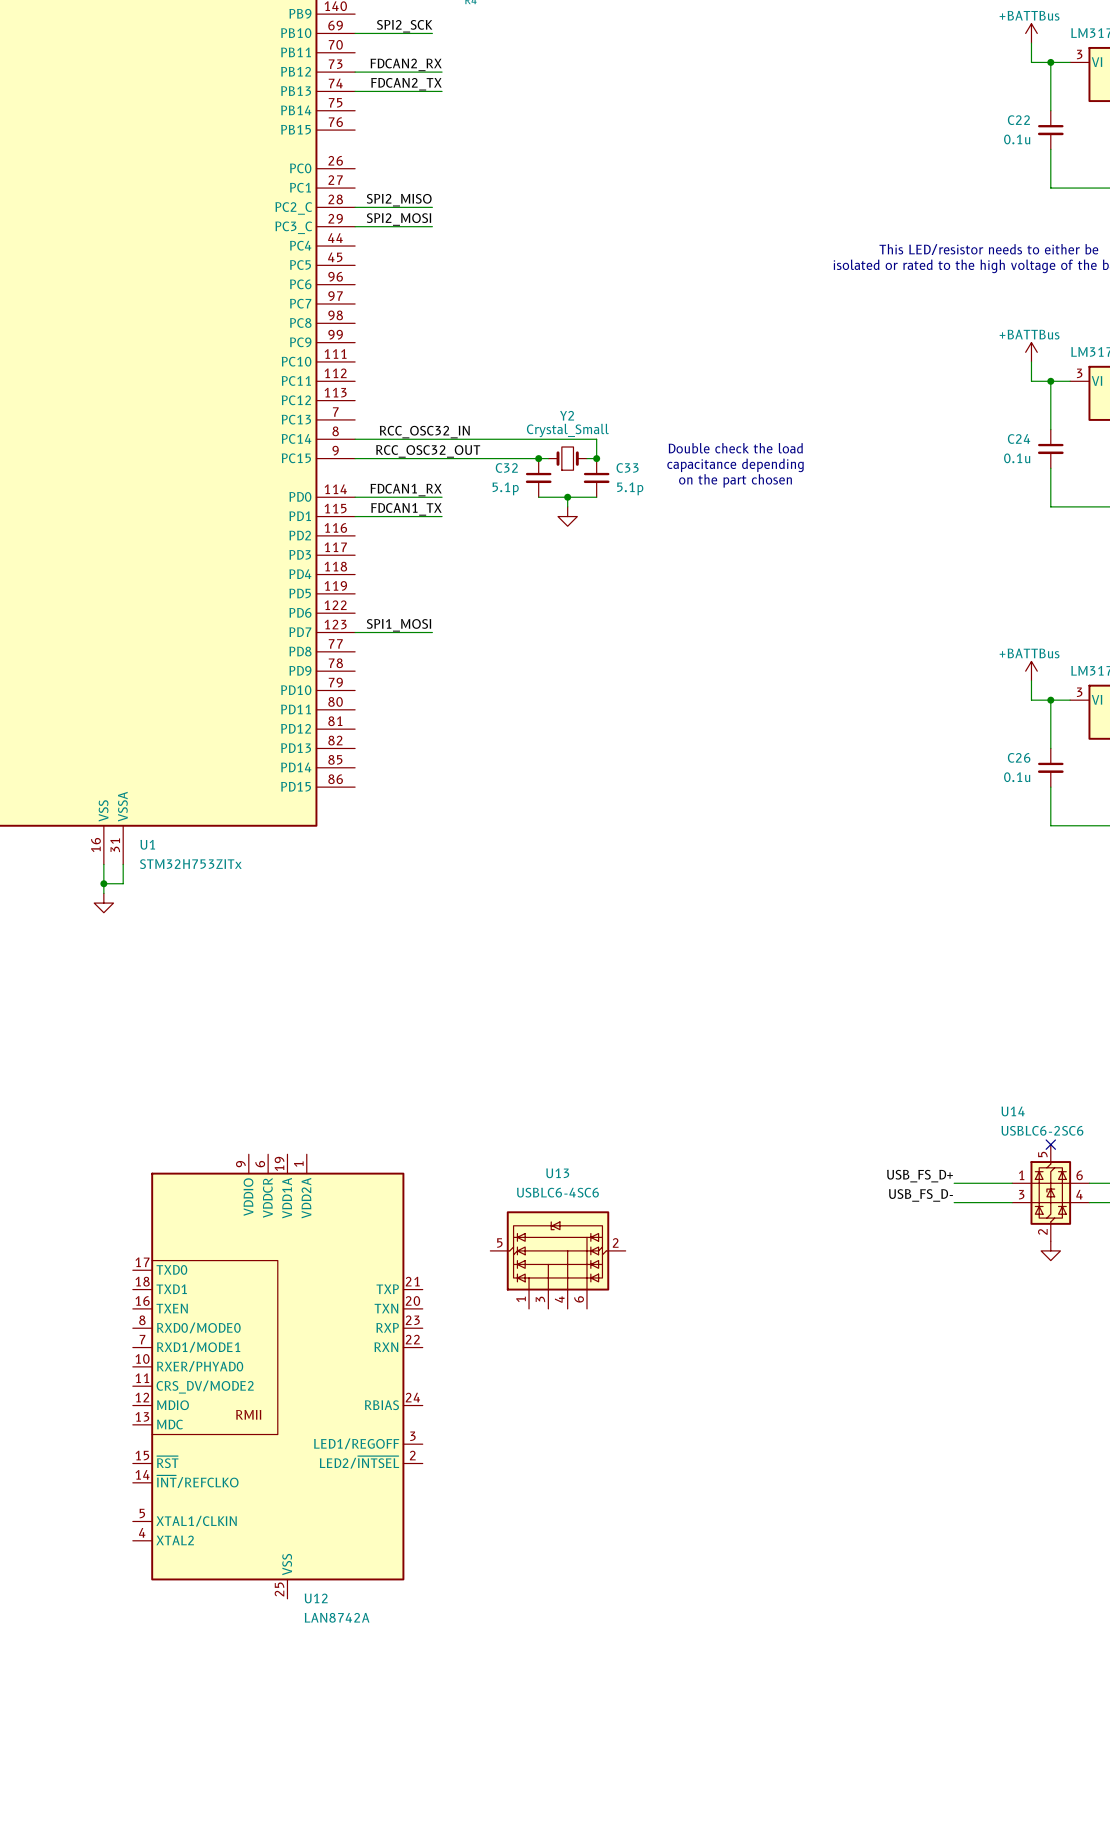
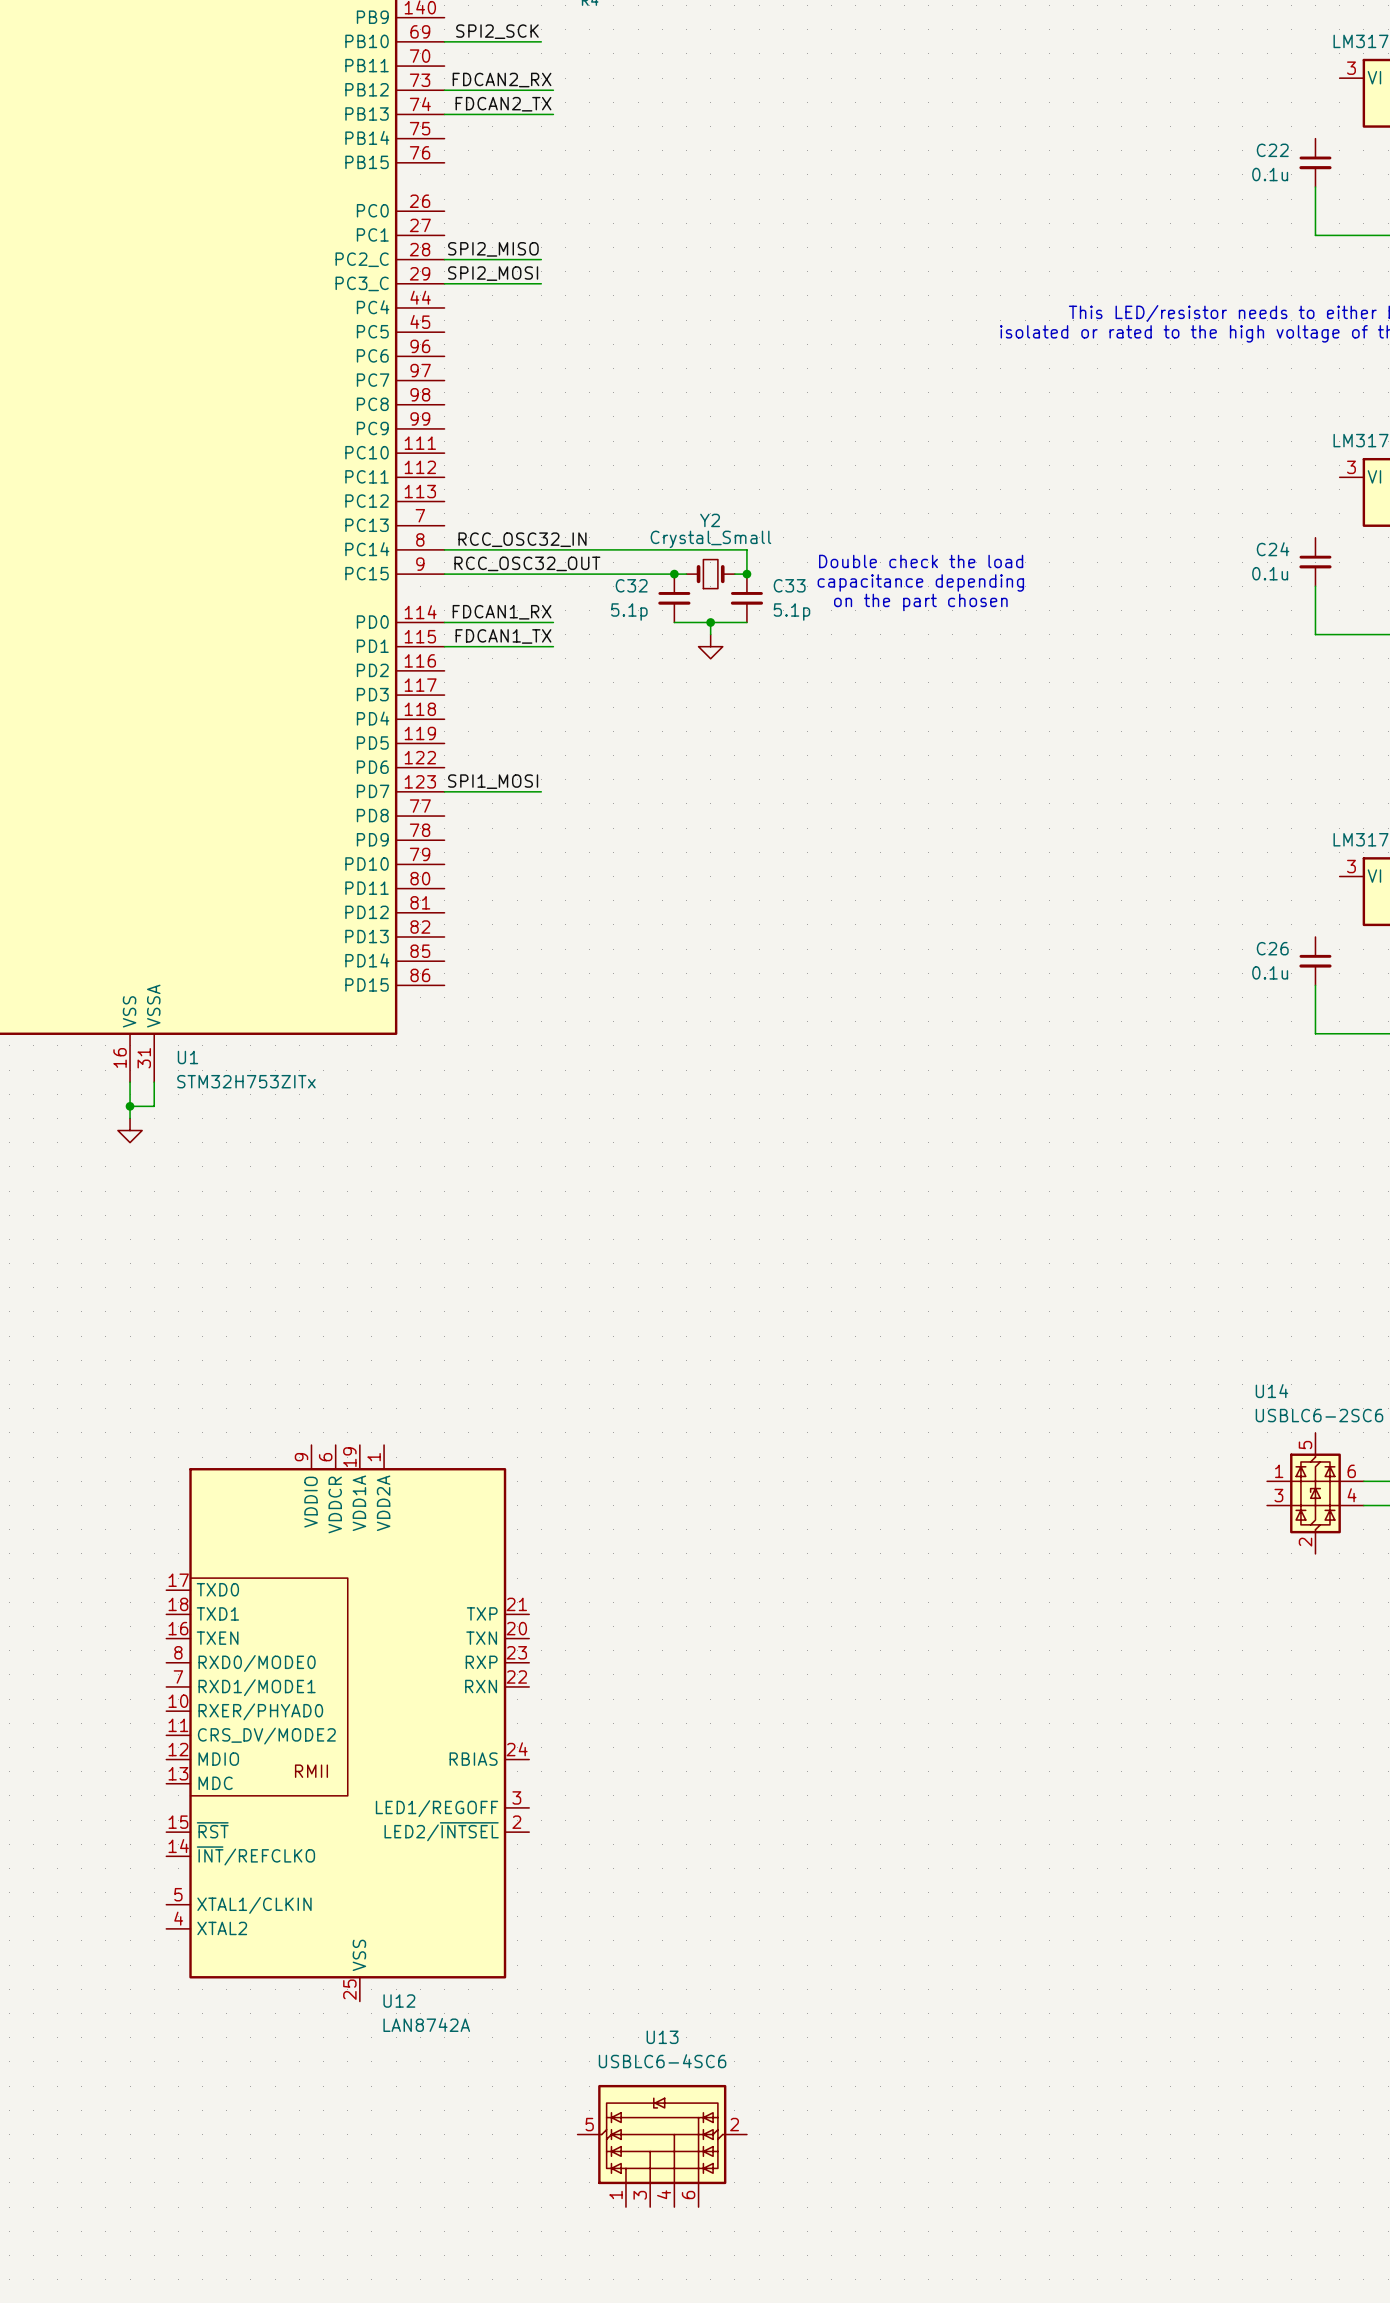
power symbol: +BATTBus (1031, 33) -> none
wire: (1031, 43) (1031, 62) (1070, 62) -> none
wire: (1050, 62) (1050, 110) -> none
junction: (1050, 62) -> none
power symbol: +BATTBus (1031, 352) -> none
wire: (1031, 361) (1031, 381) (1070, 381) -> none
wire: (1050, 381) (1050, 429) -> none
junction: (1050, 381) -> none
power symbol: +BATTBus (1031, 671) -> none
wire: (1031, 680) (1031, 700) (1070, 700) -> none
wire: (1050, 700) (1050, 748) -> none
junction: (1050, 700) -> none
no-connect mark: (1050, 1144) -> none
label: USB_FS_D+ (920, 1176) -> none
wire: (954, 1183) (1012, 1183) -> none
label: USB_FS_D- (920, 1195) -> none
wire: (954, 1202) (1012, 1202) -> none
power symbol: (1050, 1250) -> none
U13 position: (558, 1260) -> (662, 2146)

